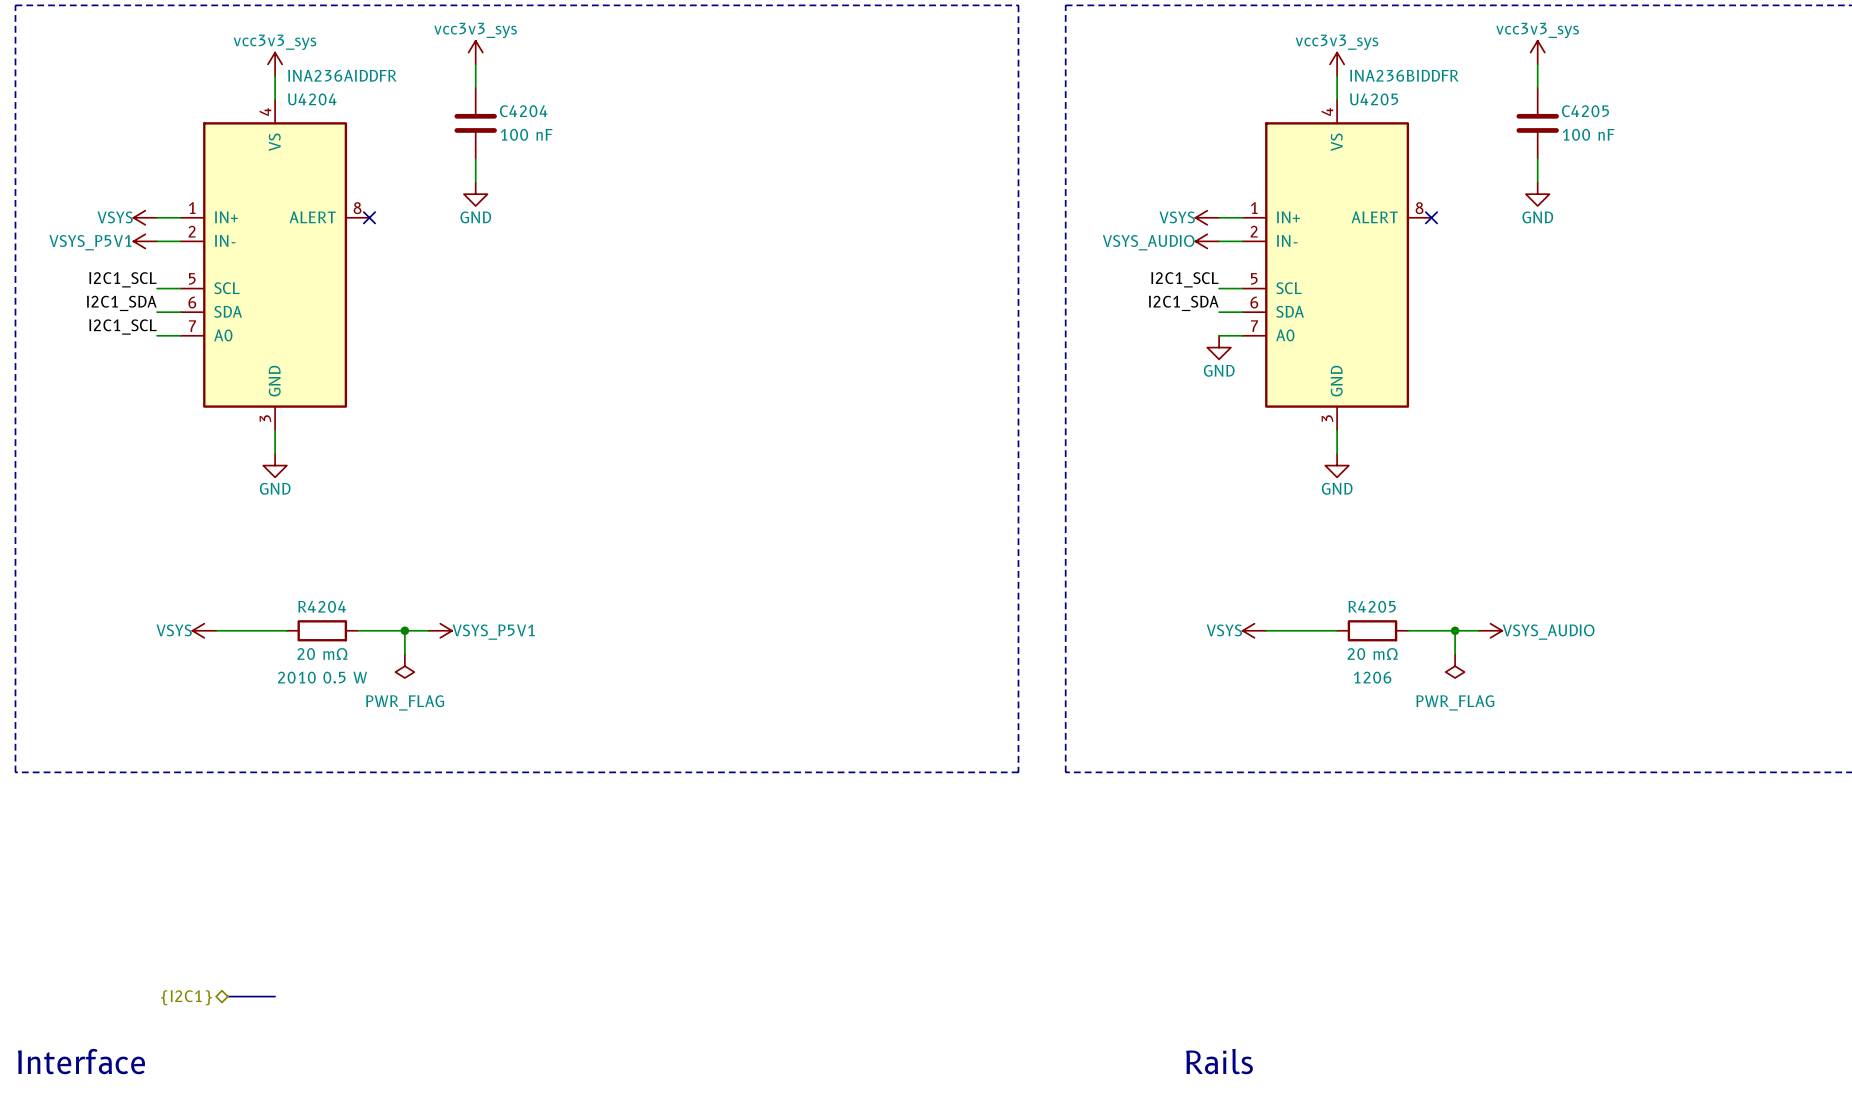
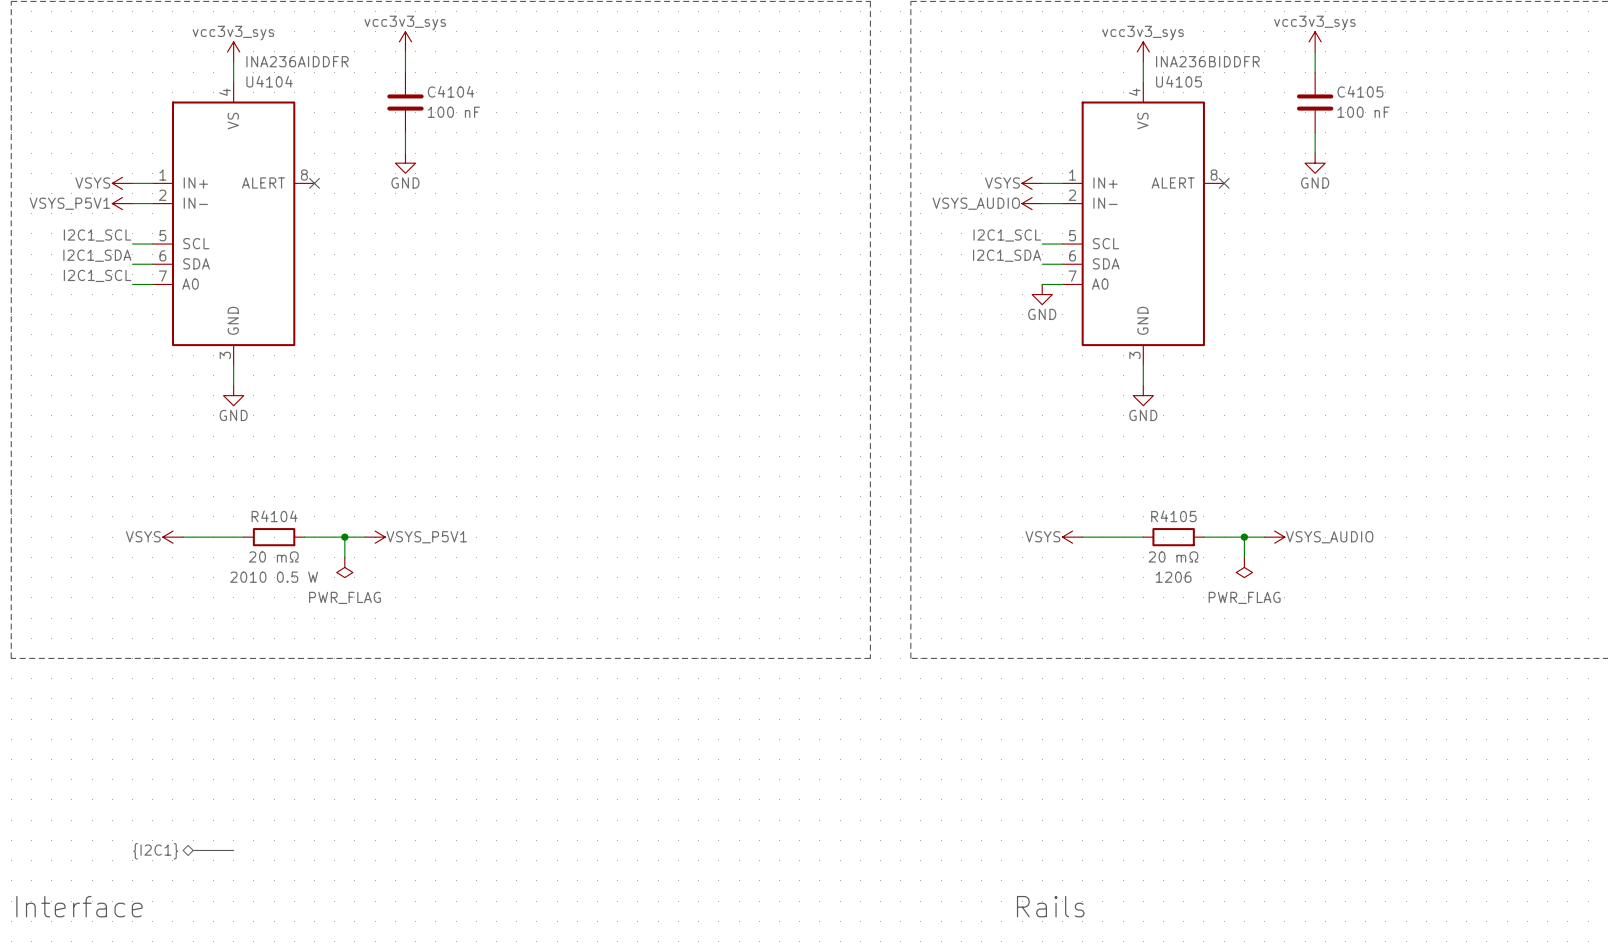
U4204 name: U4204 (312, 99) -> U4104 (269, 81)
U4205 name: U4205 (1374, 99) -> U4105 (1179, 81)
C4204 name: C4204 (523, 111) -> C4104 (451, 91)
C4205 name: C4205 (1585, 111) -> C4105 (1360, 91)
R4204 name: R4204 (322, 606) -> R4104 (274, 516)
R4205 name: R4205 (1372, 606) -> R4105 (1173, 516)

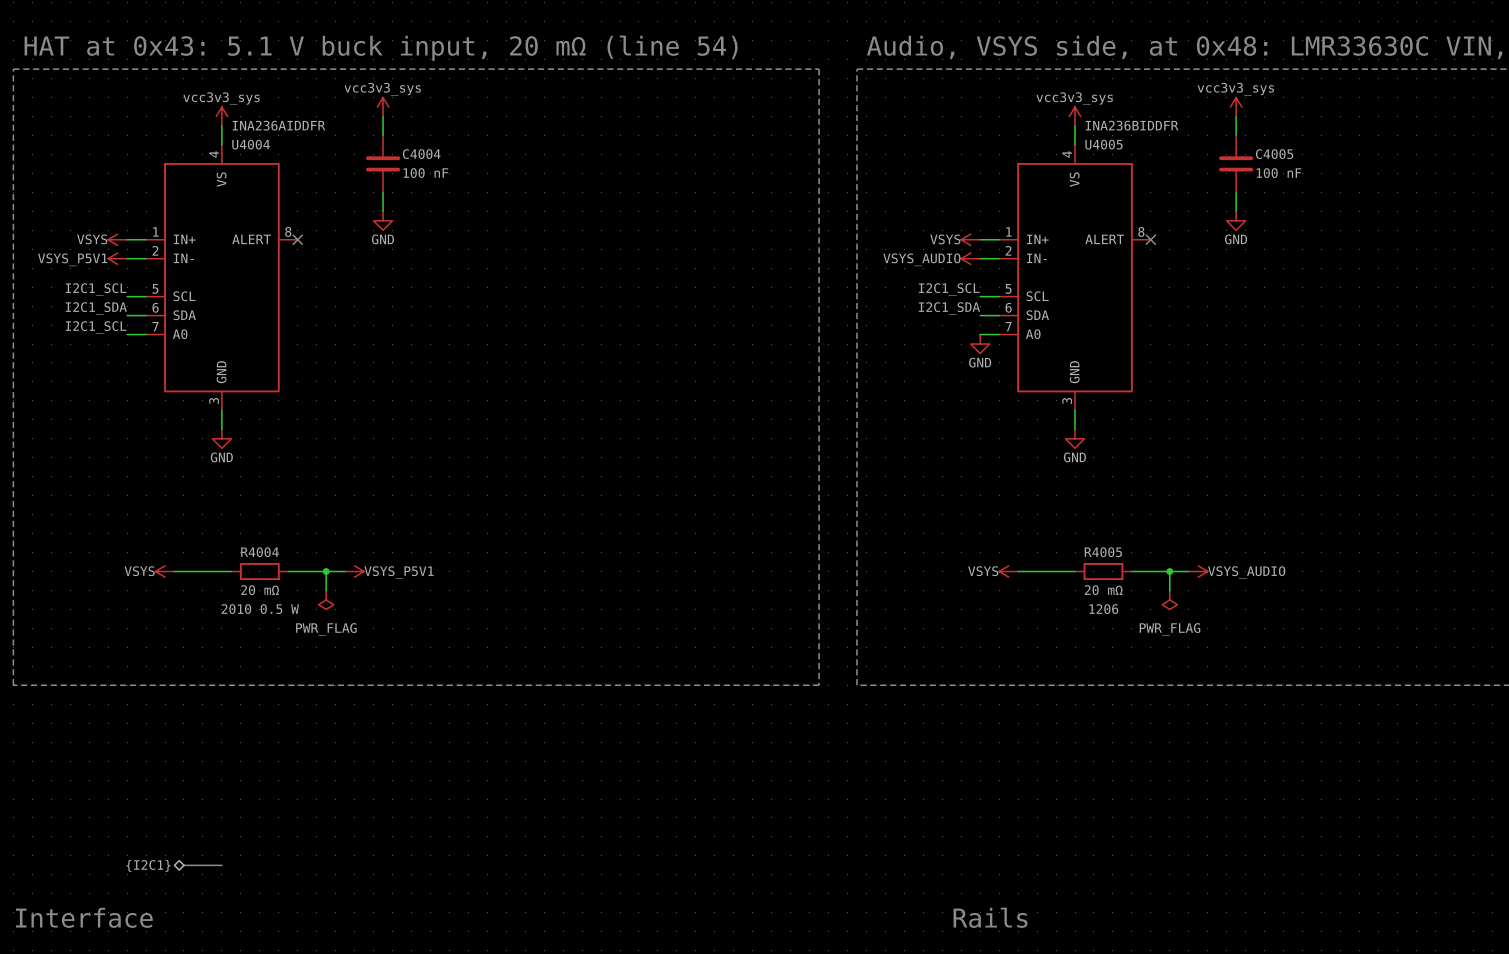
U4104 name: U4104 (269, 81) -> U4004 (251, 144)
U4105 name: U4105 (1179, 81) -> U4005 (1103, 144)
C4104 name: C4104 (451, 91) -> C4004 (421, 154)
C4105 name: C4105 (1360, 91) -> C4005 (1274, 154)
R4104 name: R4104 (274, 516) -> R4004 (259, 552)
R4105 name: R4105 (1173, 516) -> R4005 (1103, 552)

